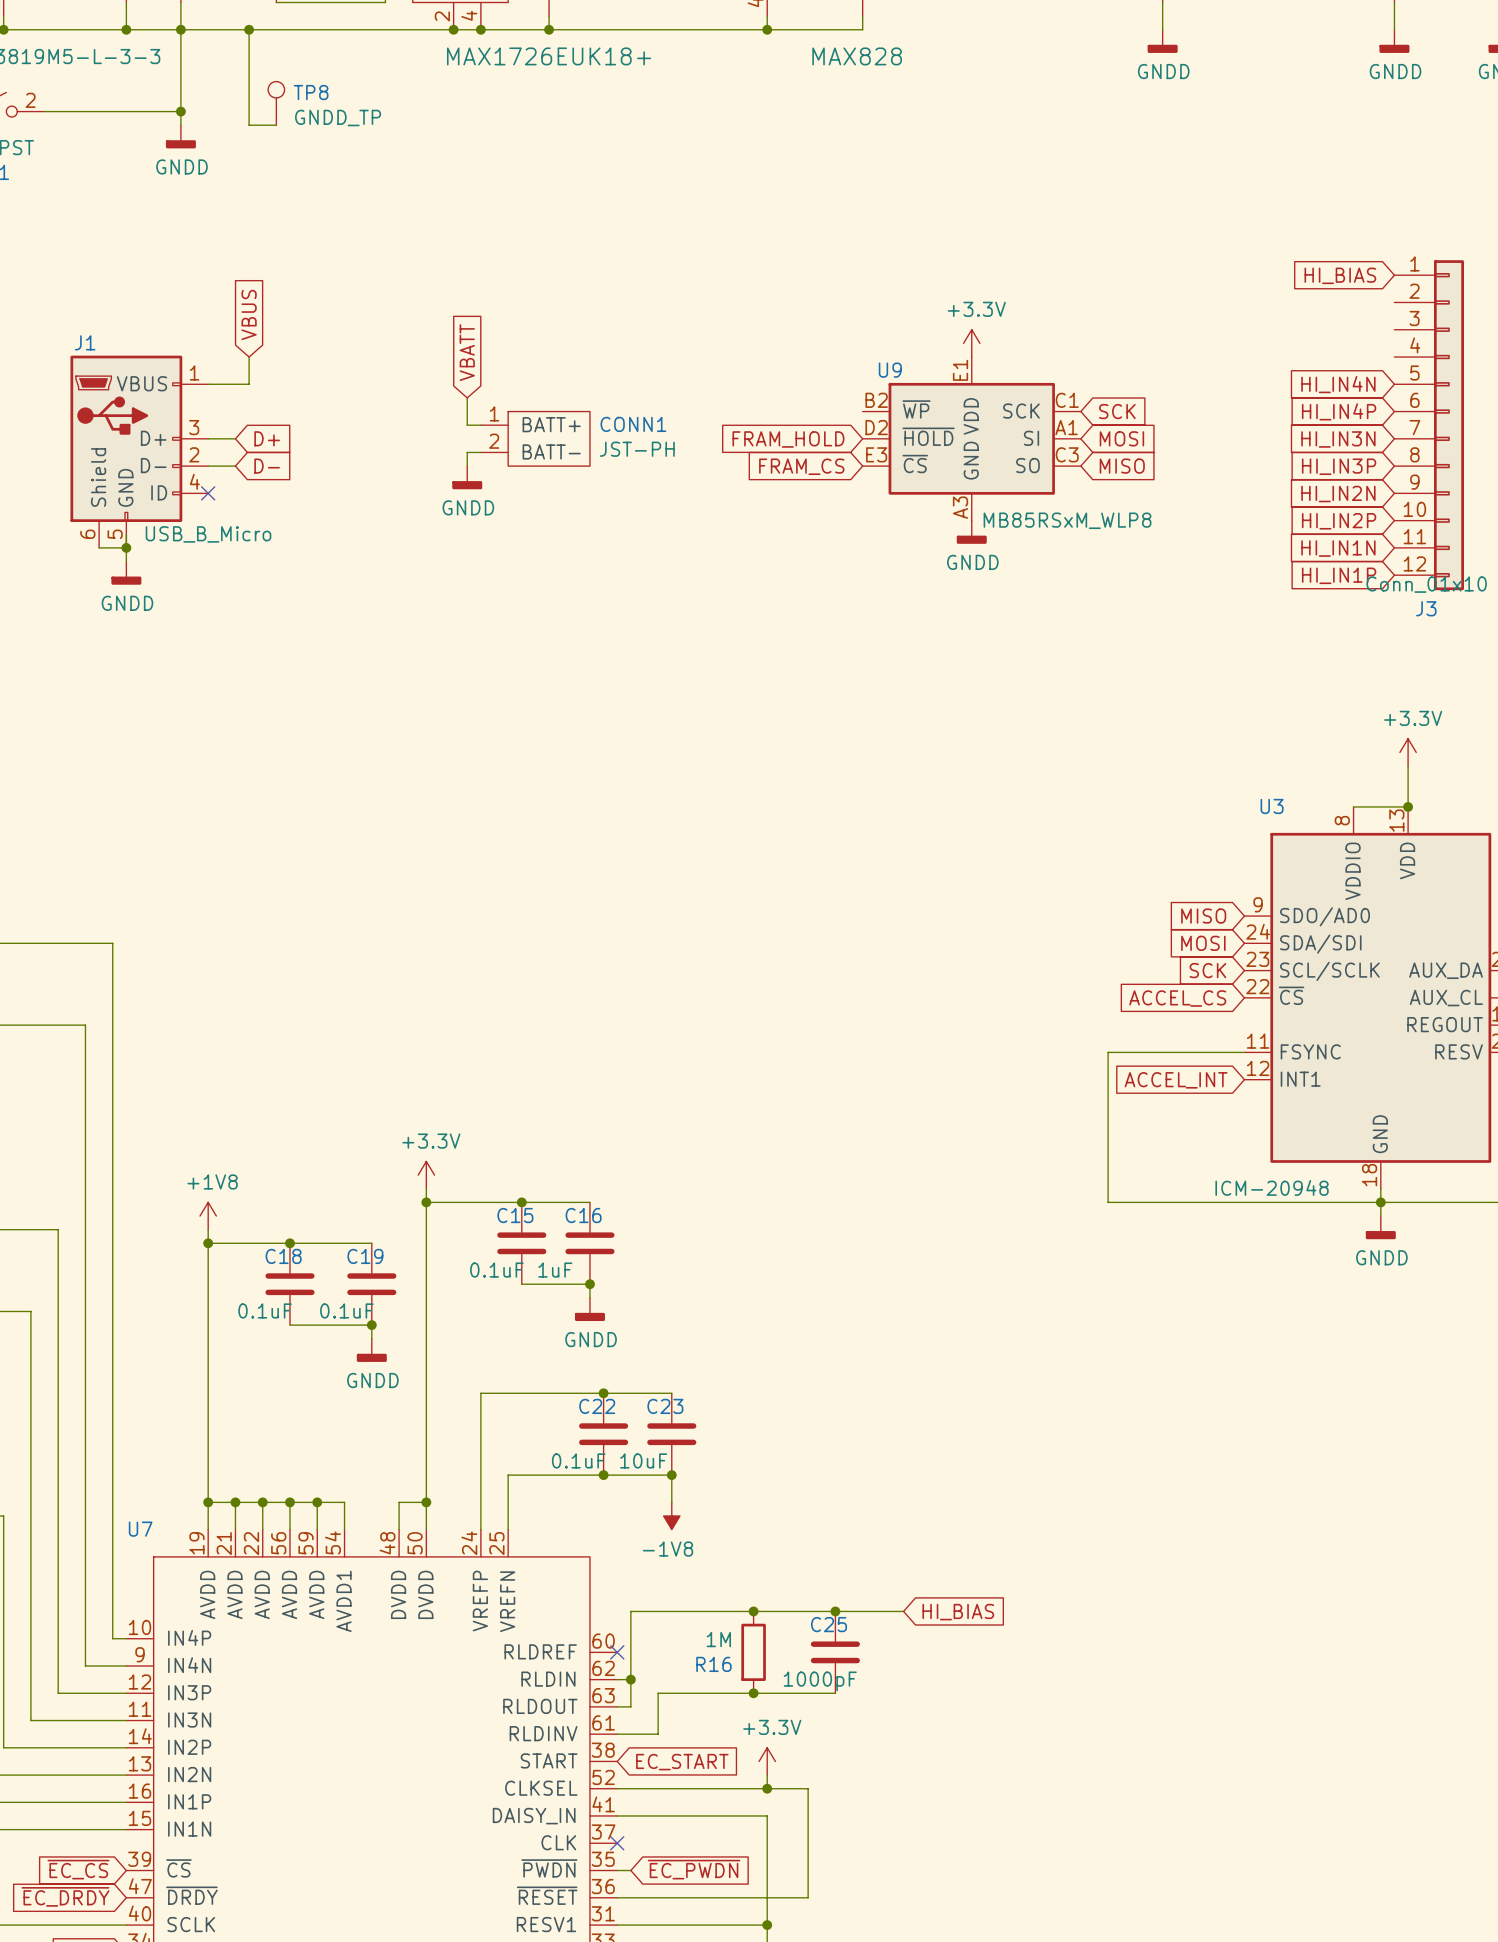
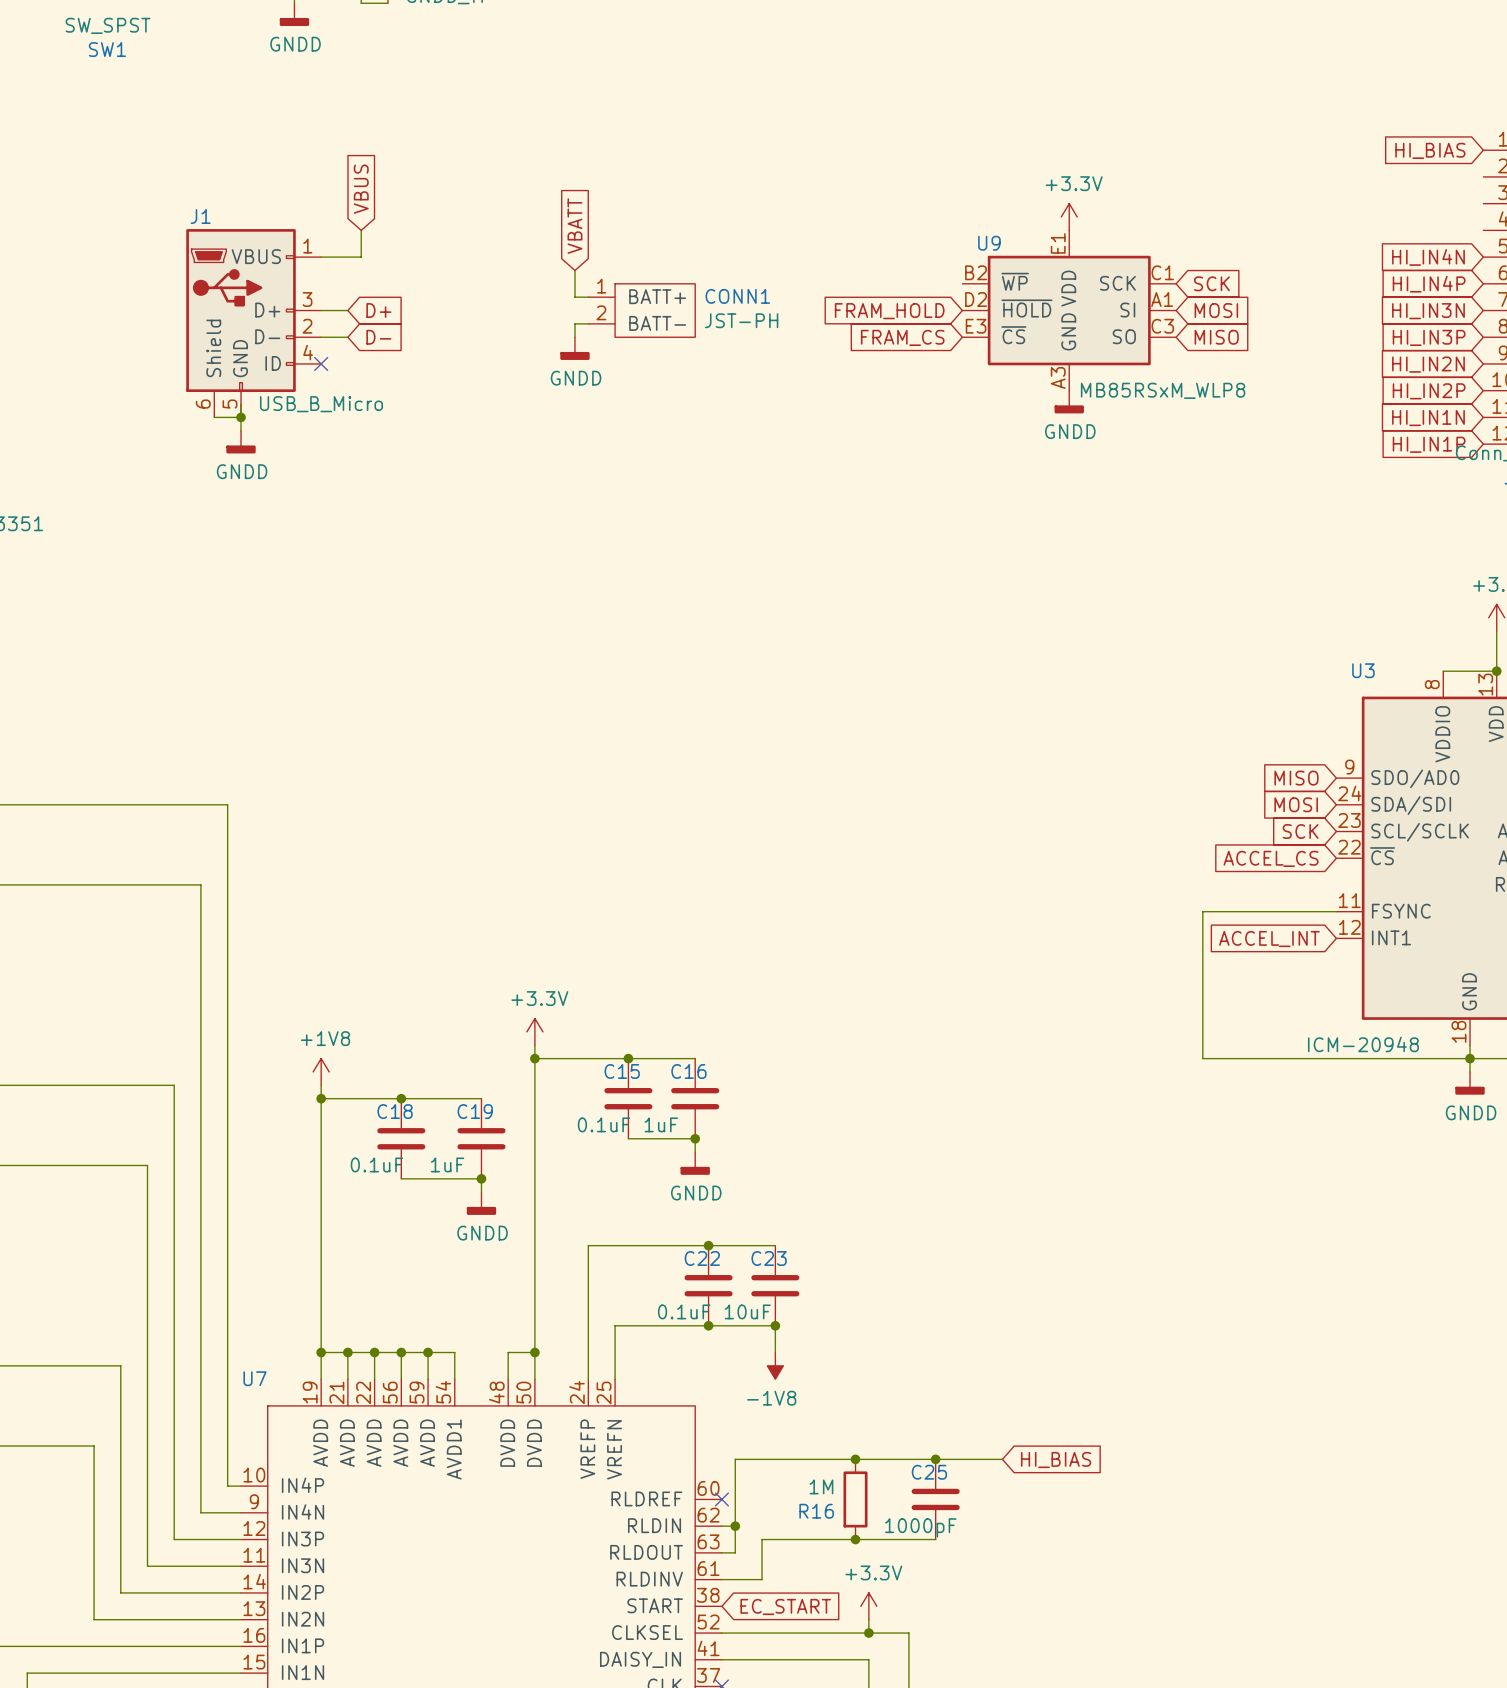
C19 value: 0.1uF (346, 1310) -> 1uF (447, 1164)

